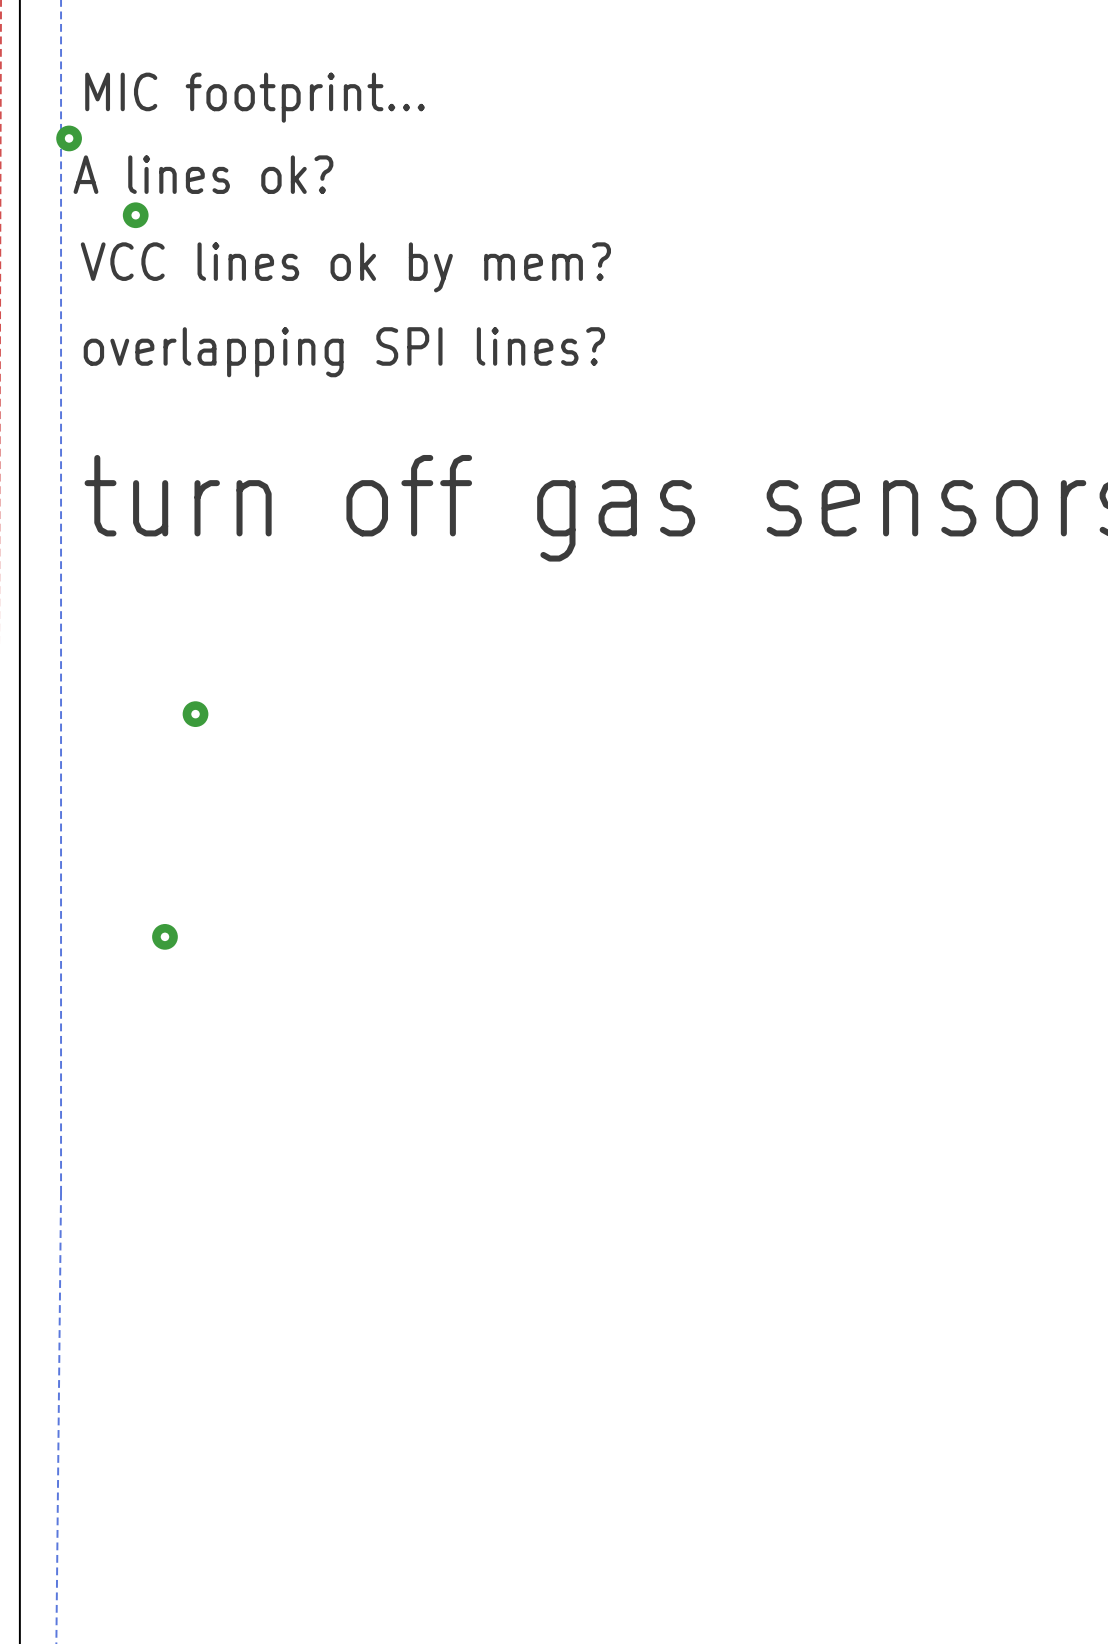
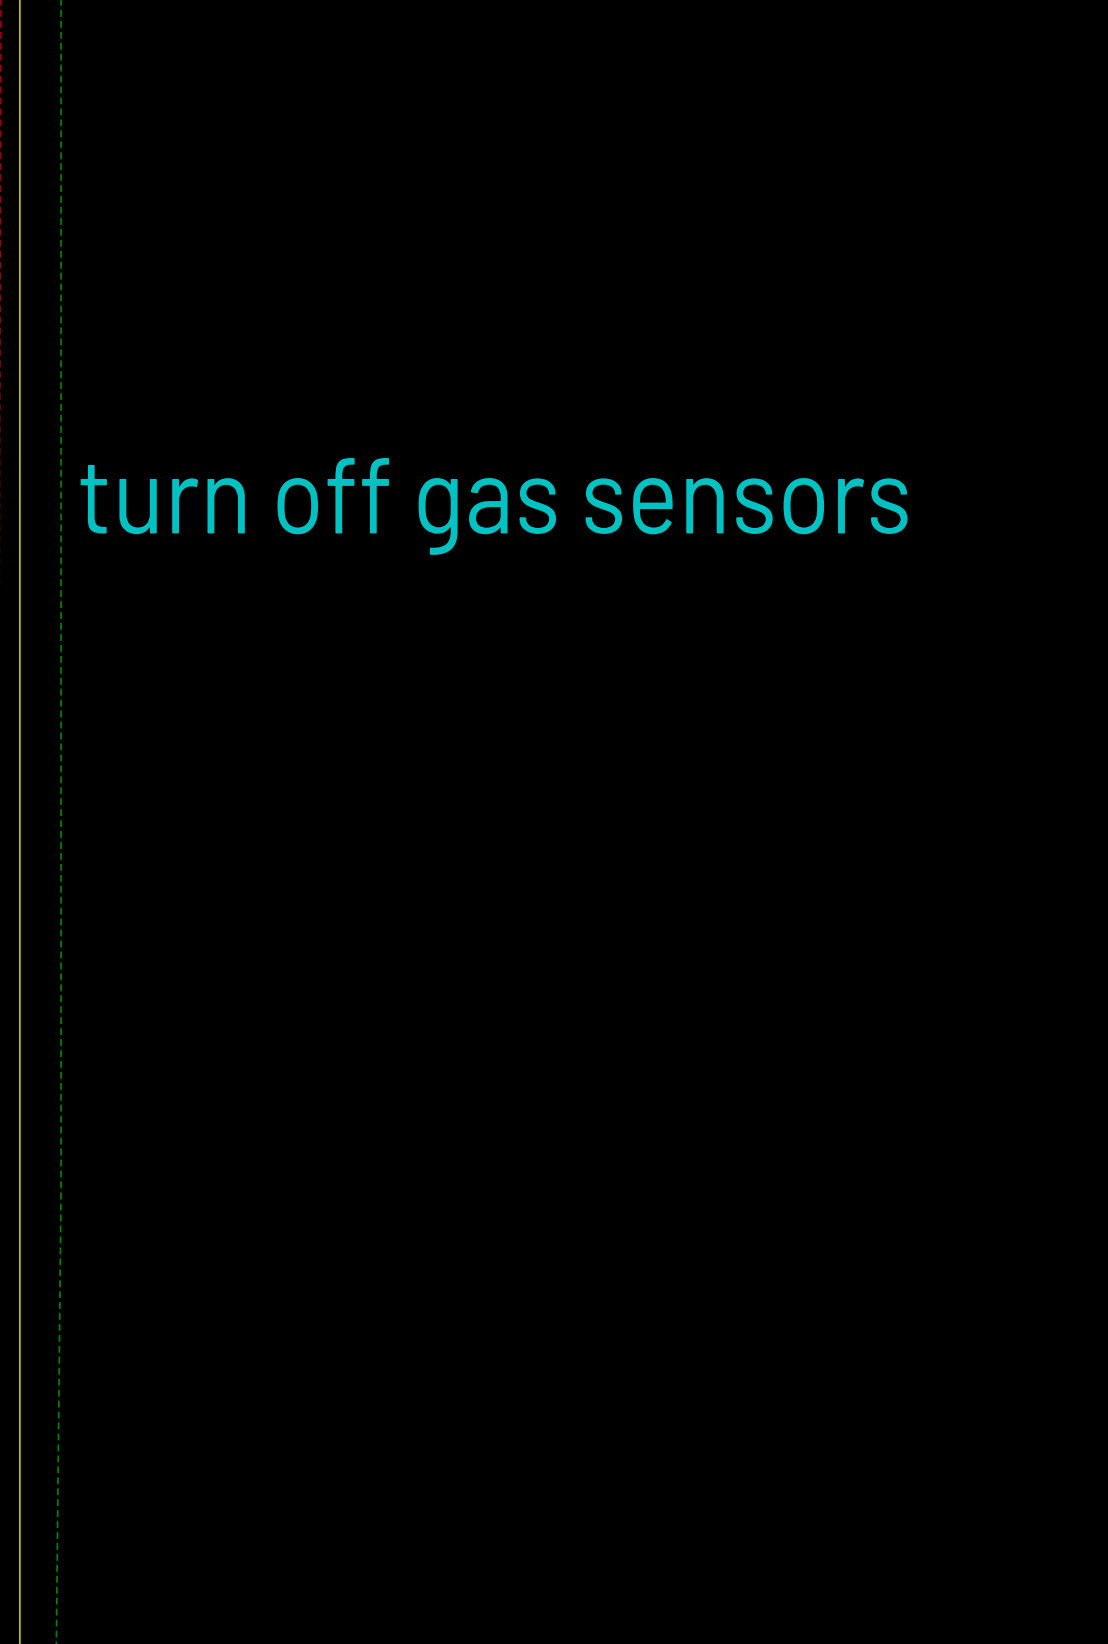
text: MIC footprint... (255, 97) -> none
via: (69, 138) -> none
text: A lines ok? (203, 174) -> none
via: (135, 215) -> none
text: VCC lines ok by mem? (345, 267) -> none
text: overlapping SPI lines? (344, 352) -> none
via: (195, 714) -> none
via: (164, 936) -> none

